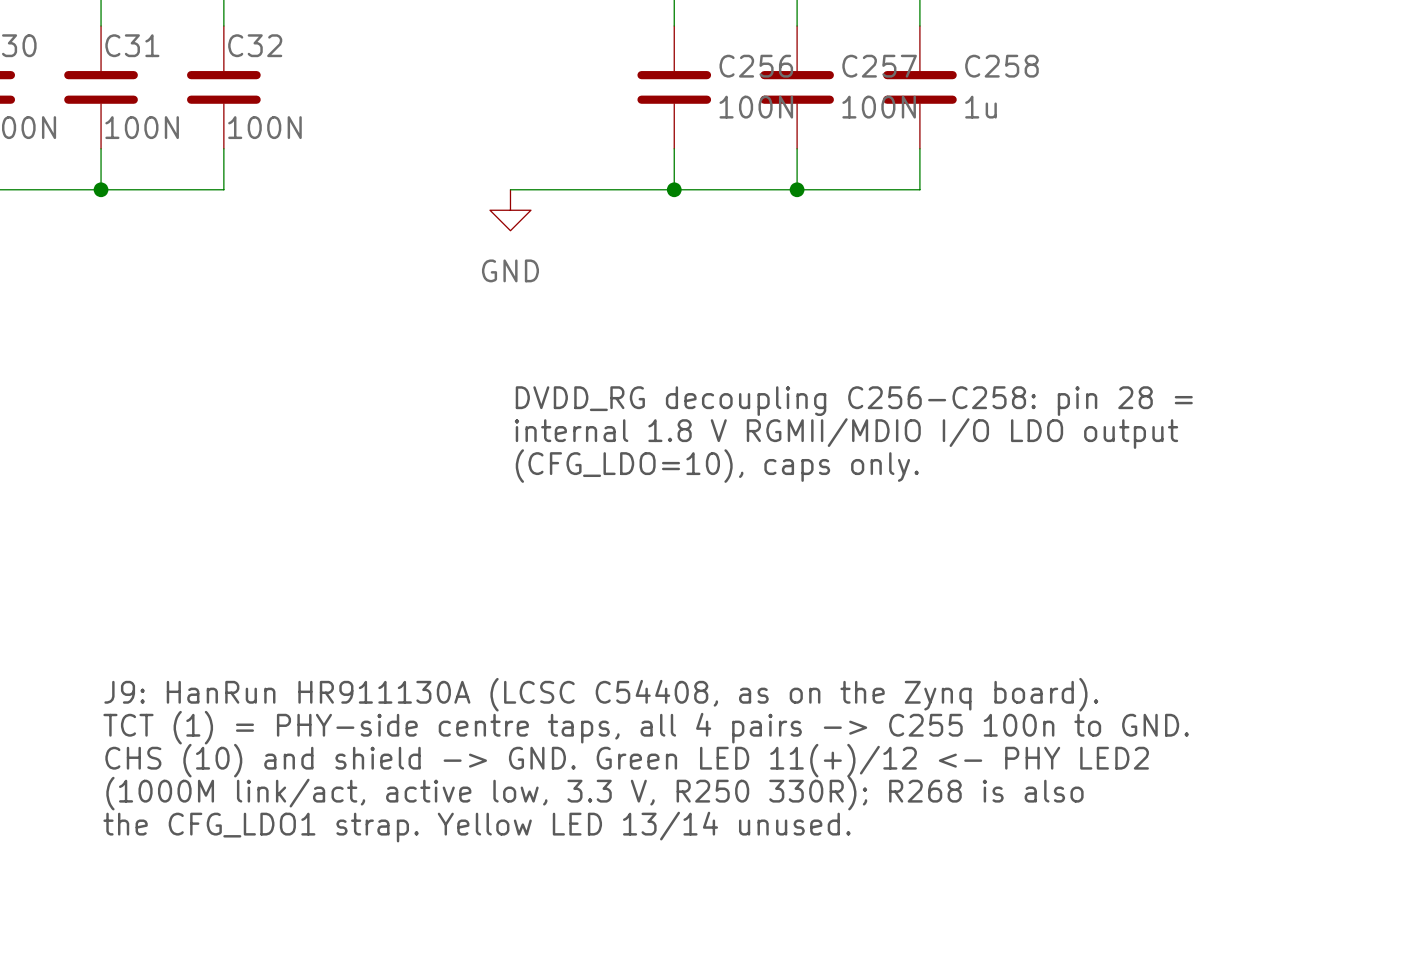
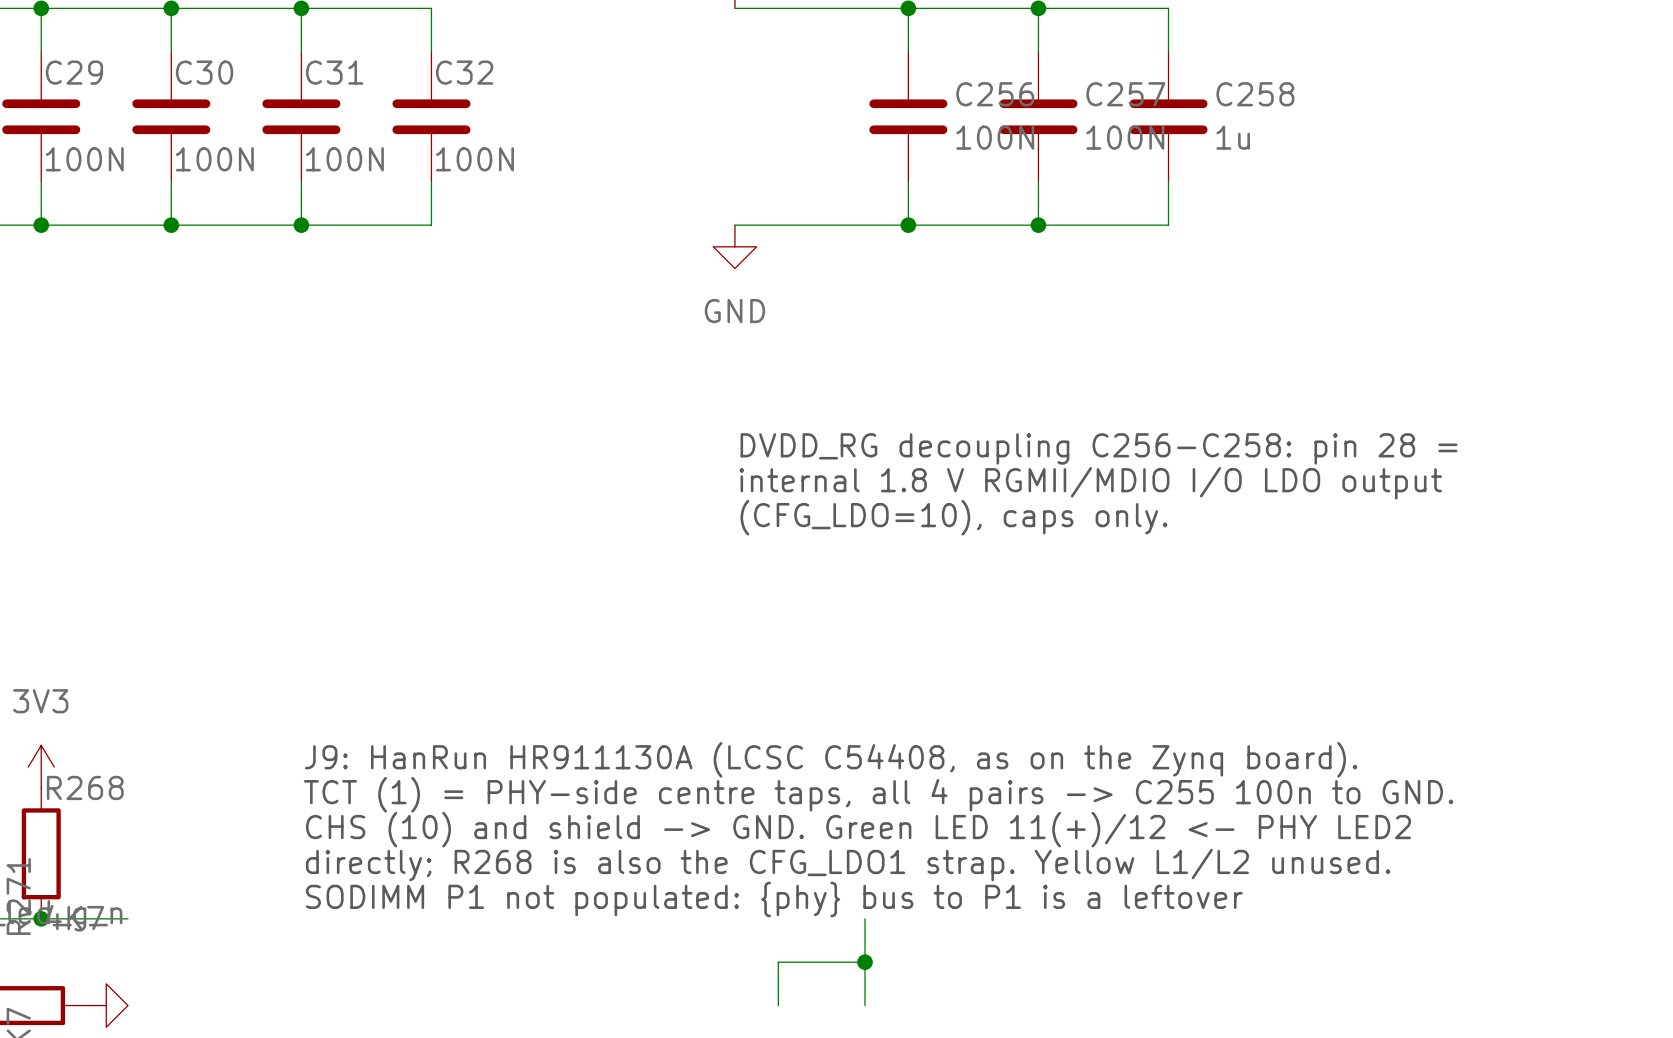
text: (1000M link/act, active low, 3.3 V, R250 330R); R268 is also (594, 793) -> directly; R268 is also the CFG_LDO1 strap. Yellow L1/L2 unused. (848, 865)
text: the CFG_LDO1 strap. Yellow LED 13/14 unused. (477, 827) -> SODIMM P1 not populated: {phy} bus to P1 is a leftover (774, 899)
wire: none -> (865, 918) (865, 1005)
wire: none -> (865, 962) (778, 962) (778, 1005)
junction: none -> (865, 962)

